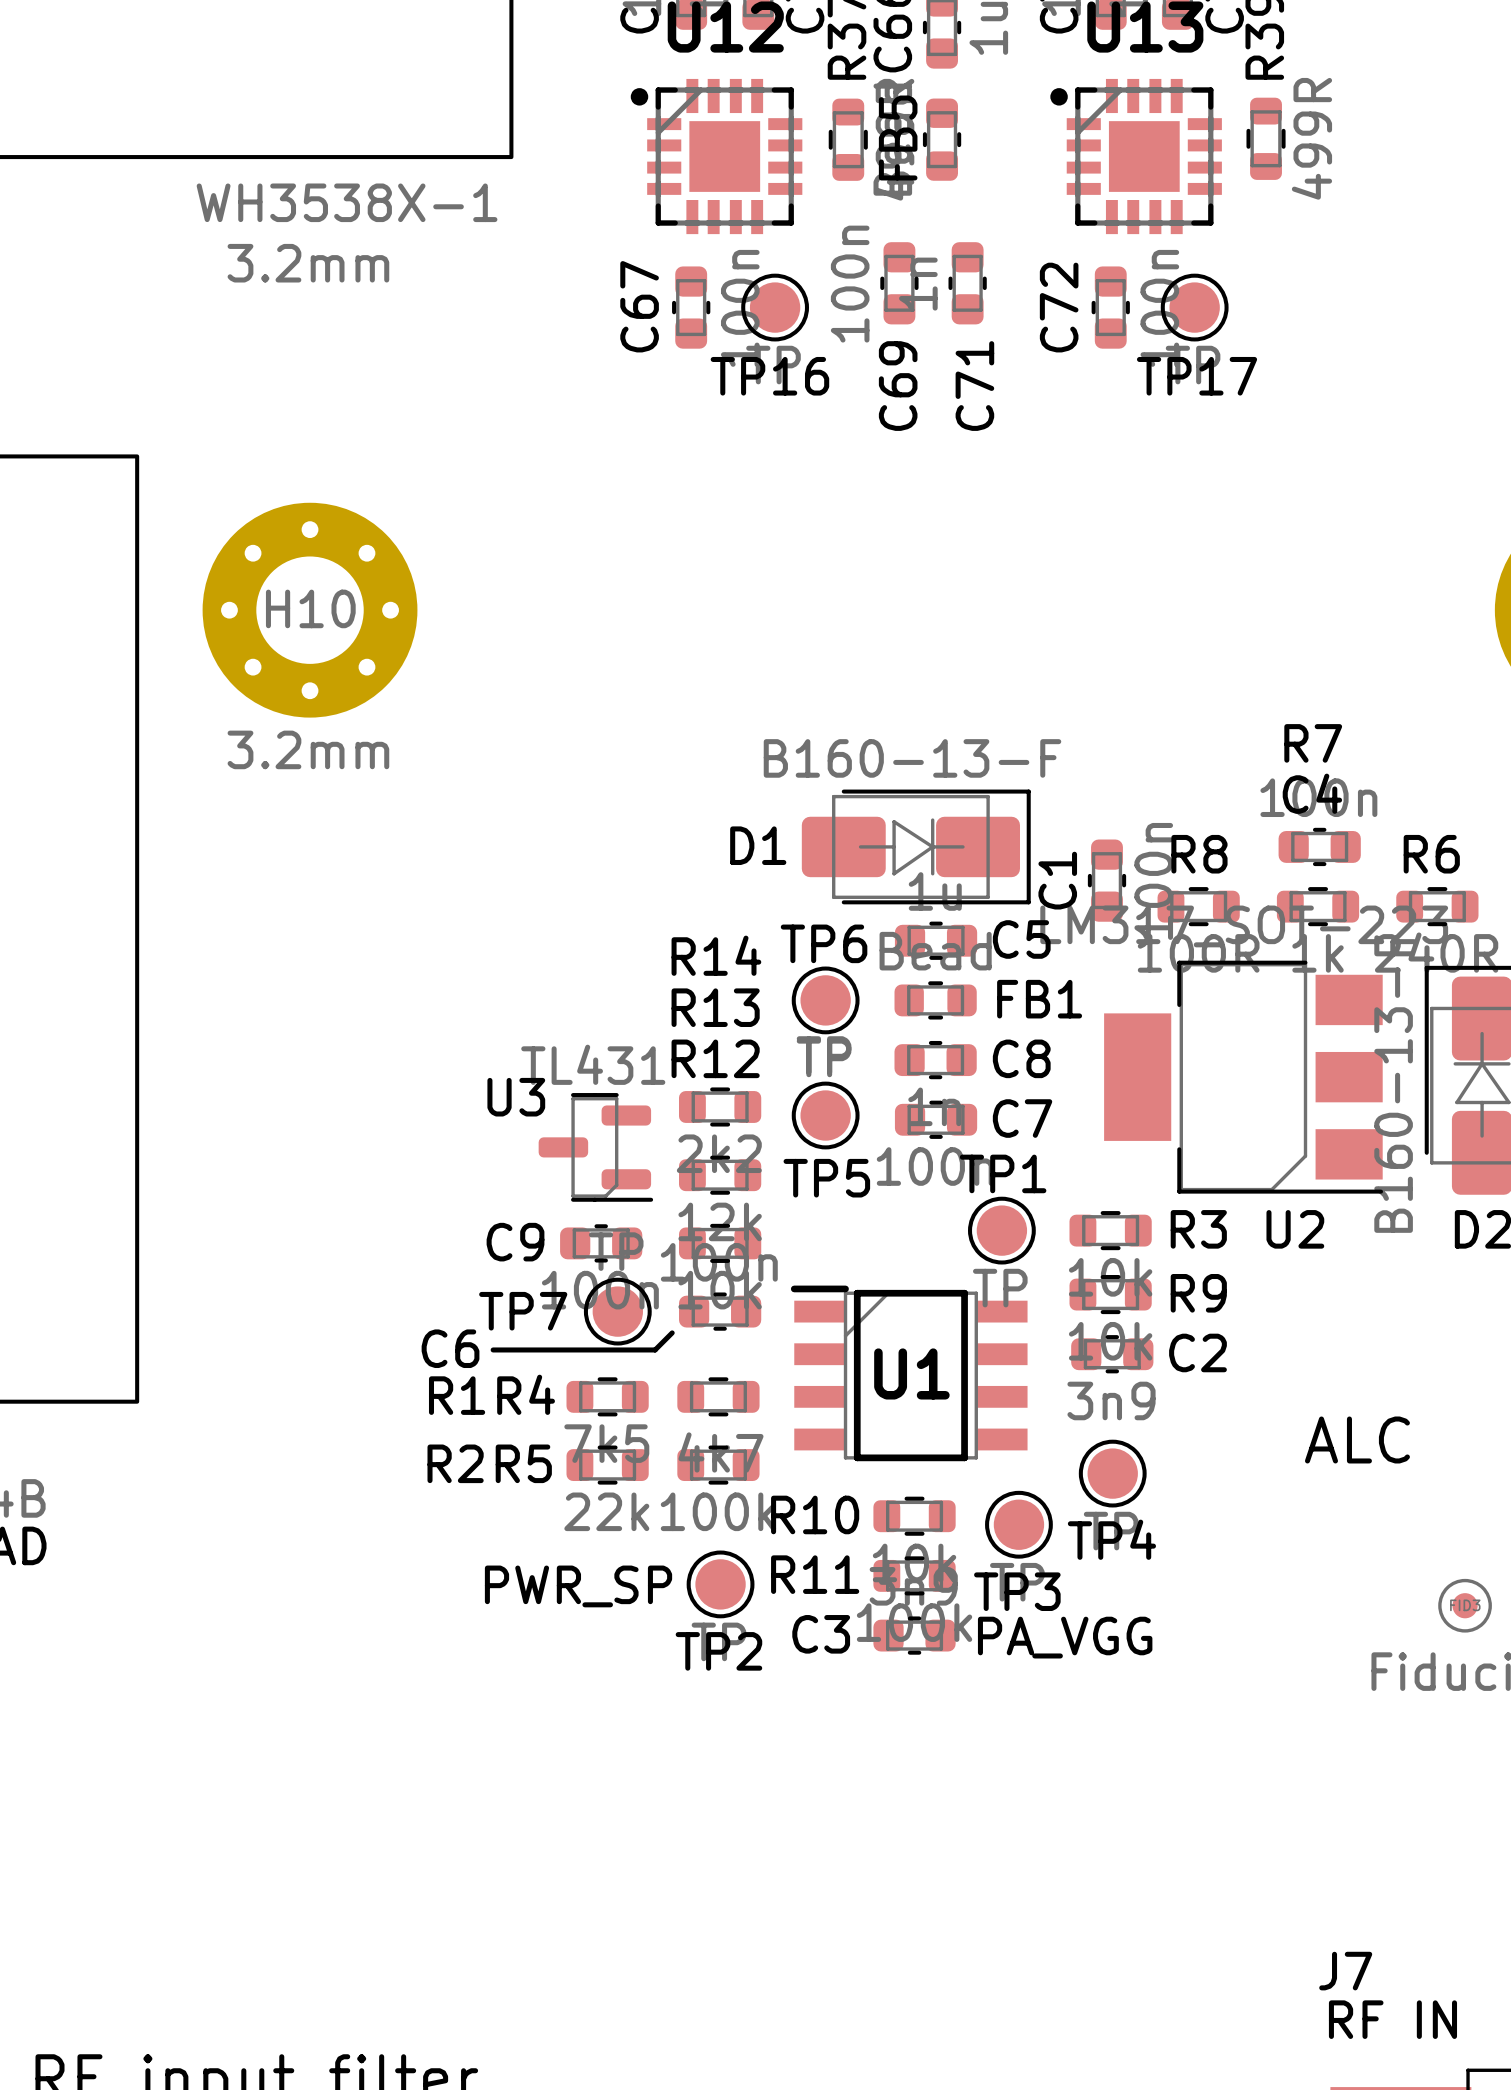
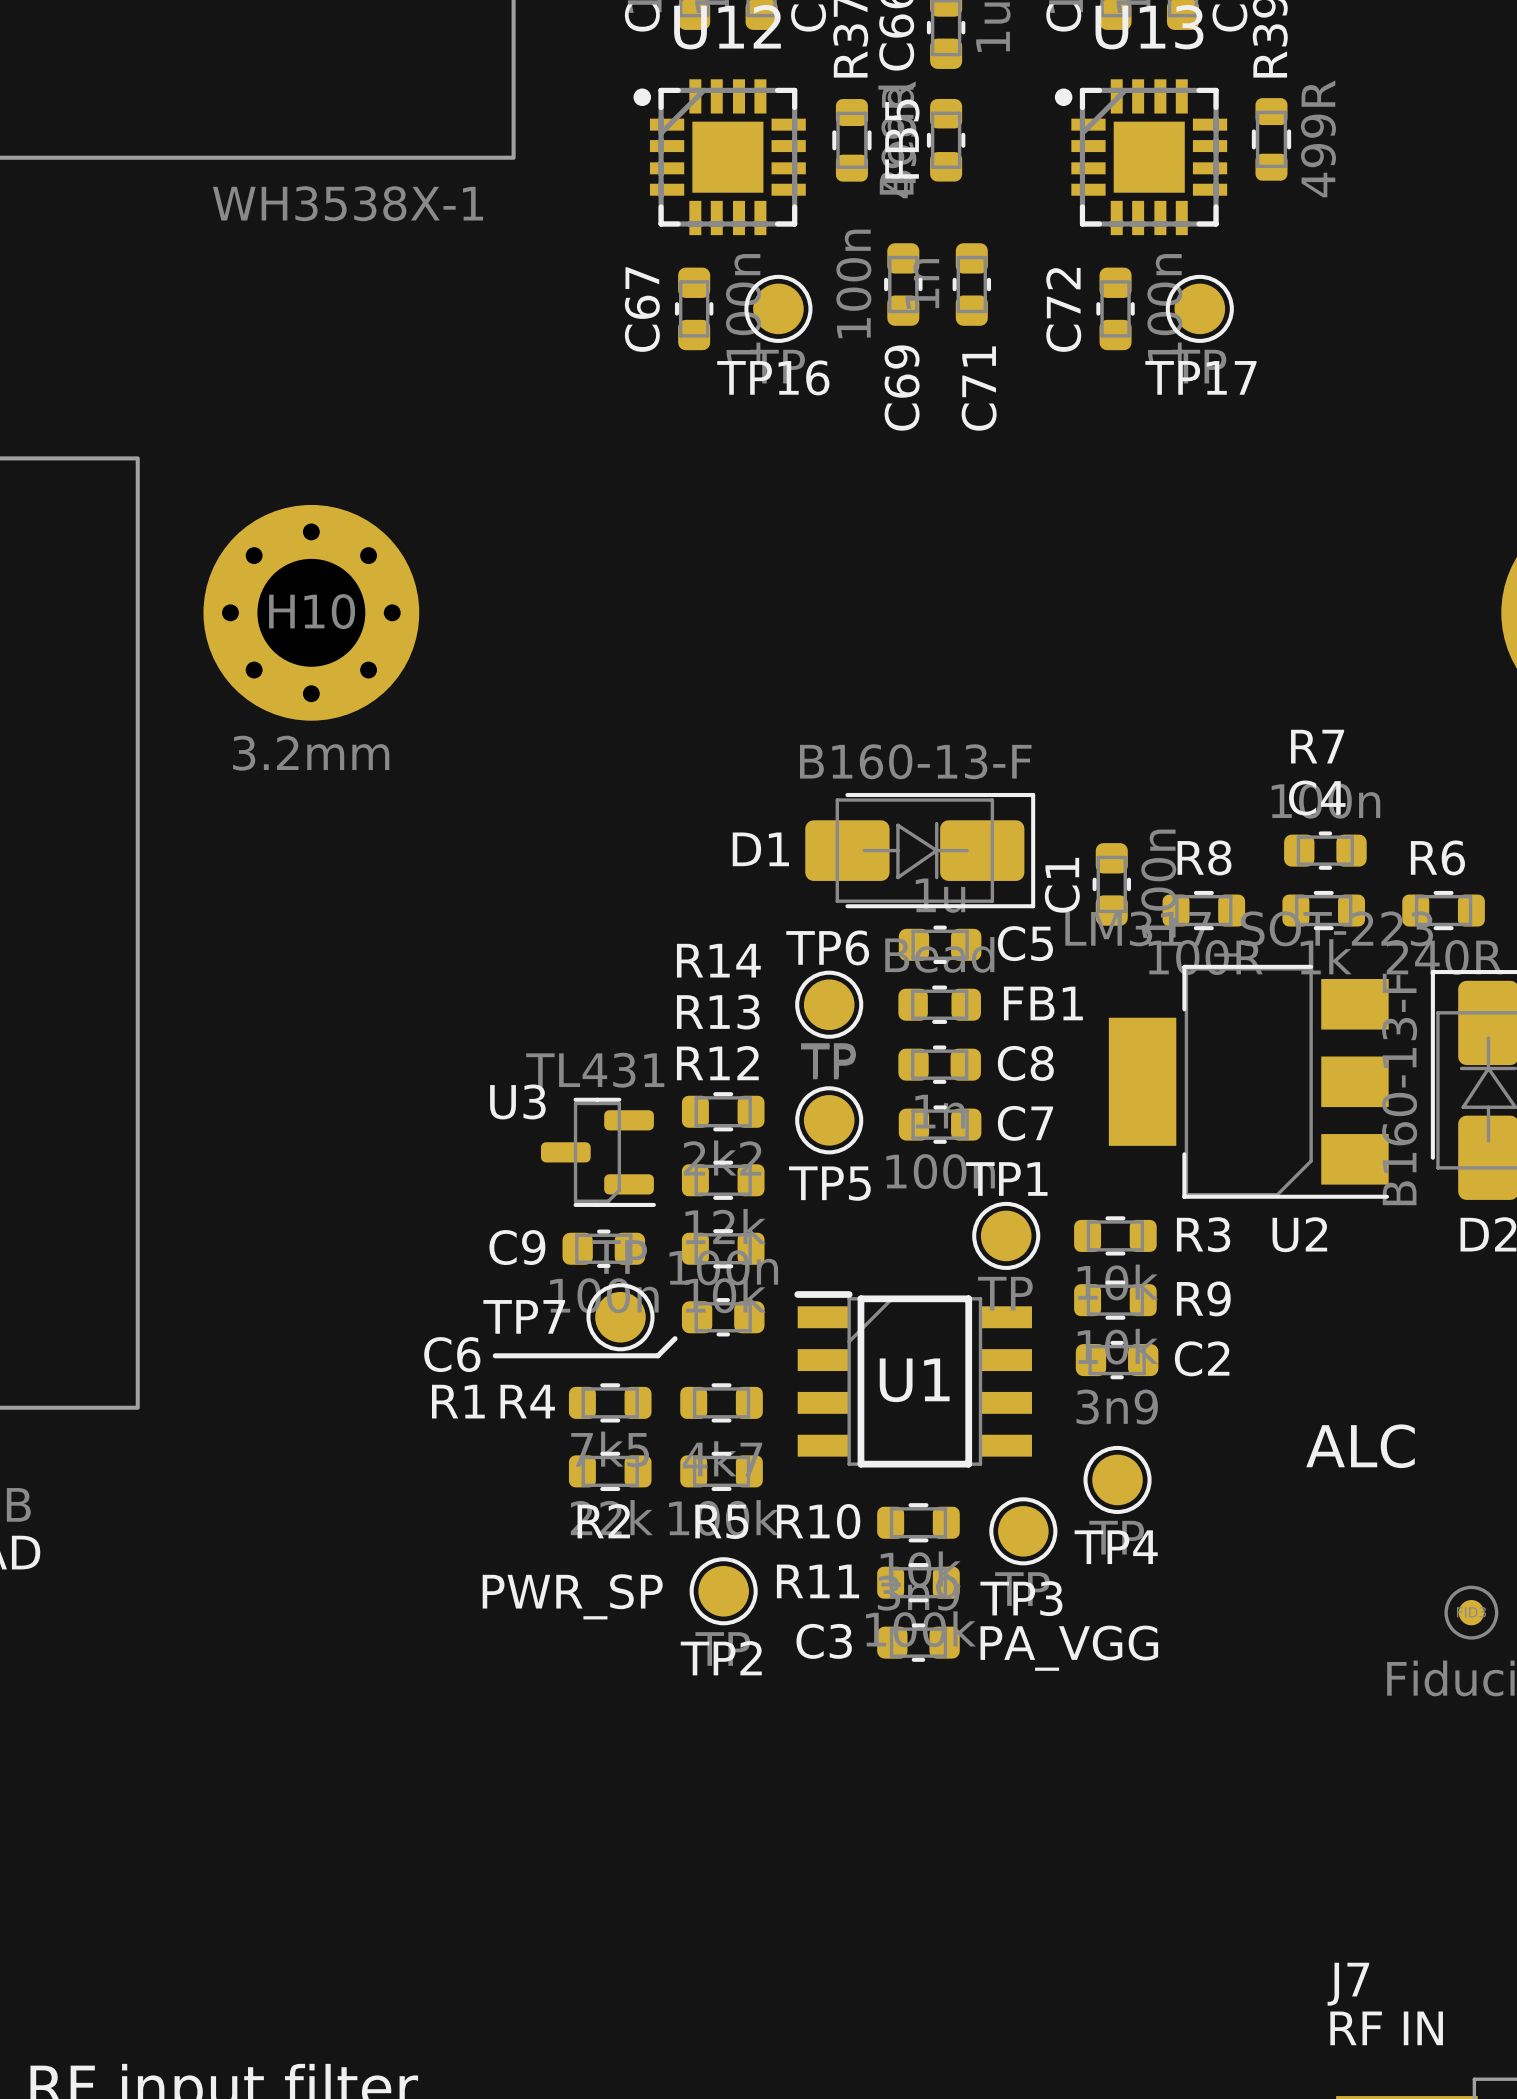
text: 3.2mm (308, 263) -> none
R2 name position: R2 (455, 1463) -> R2 (603, 1521)
R5 name position: R5 (523, 1463) -> R5 (721, 1521)

